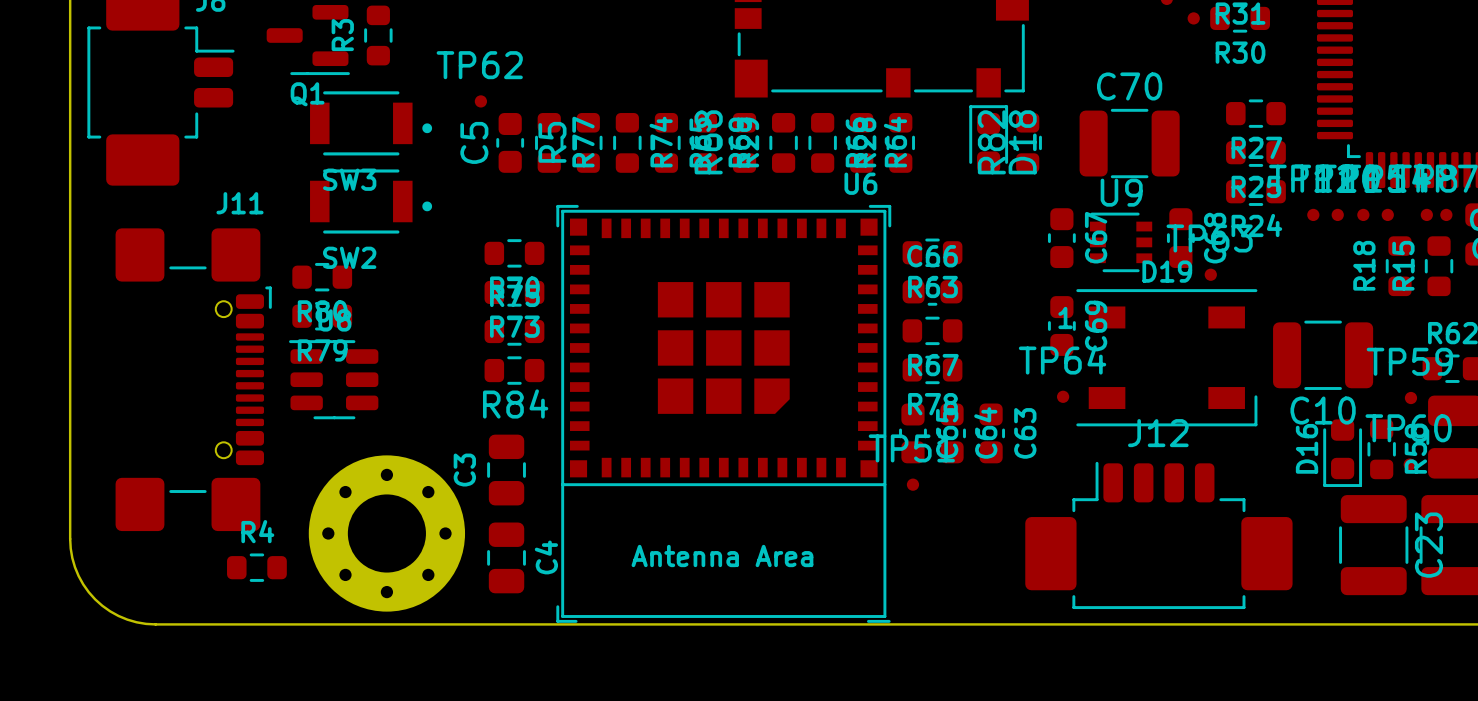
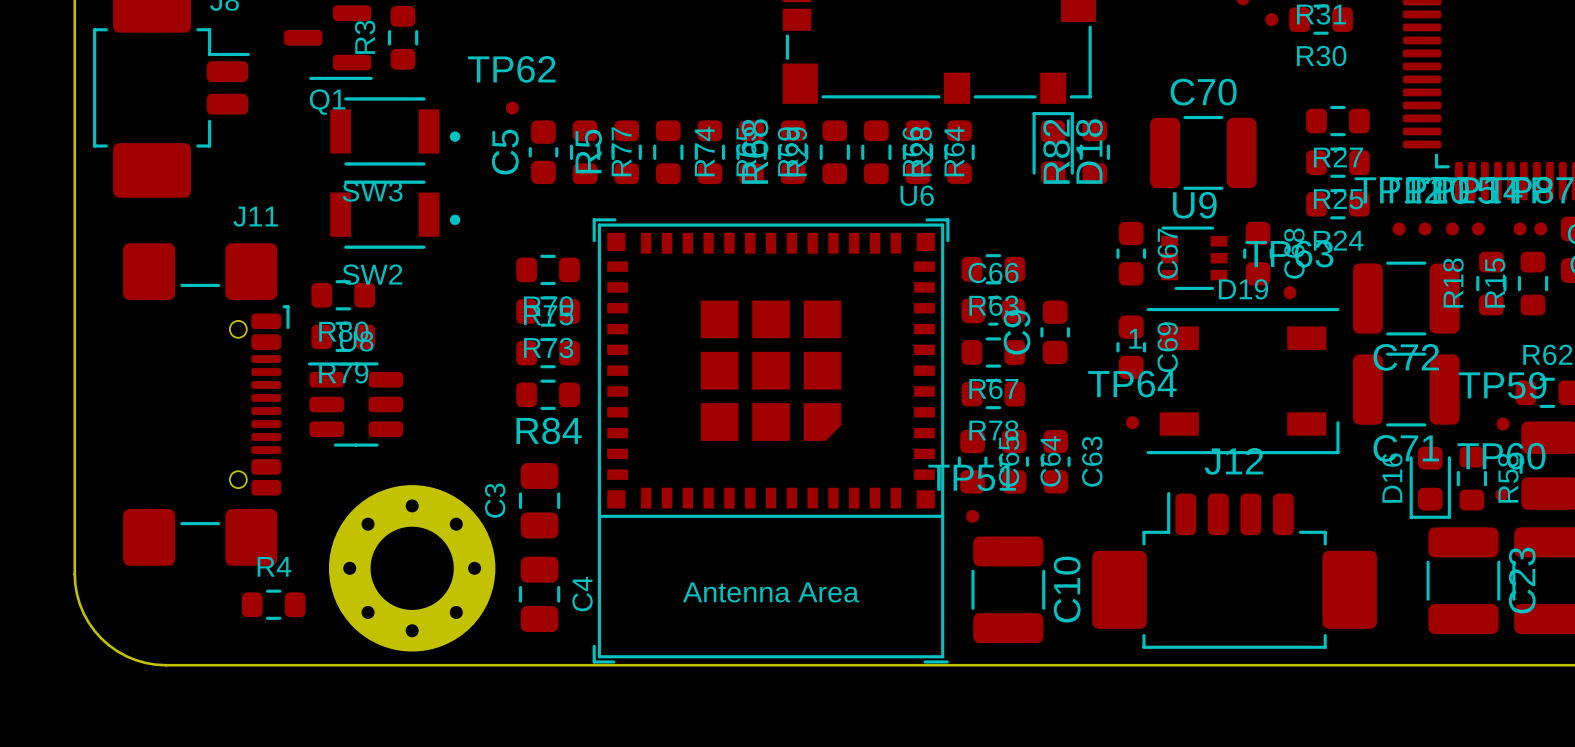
C72: none -> (1406, 298)
C9: none -> (1055, 332)
C10 rotation: 0° (1323, 355) -> 90° clockwise (1008, 589)
C10 position: (1323, 355) -> (1008, 589)
C71: none -> (1406, 389)
C10 name position: C10 (1323, 410) -> C10 (1067, 589)

